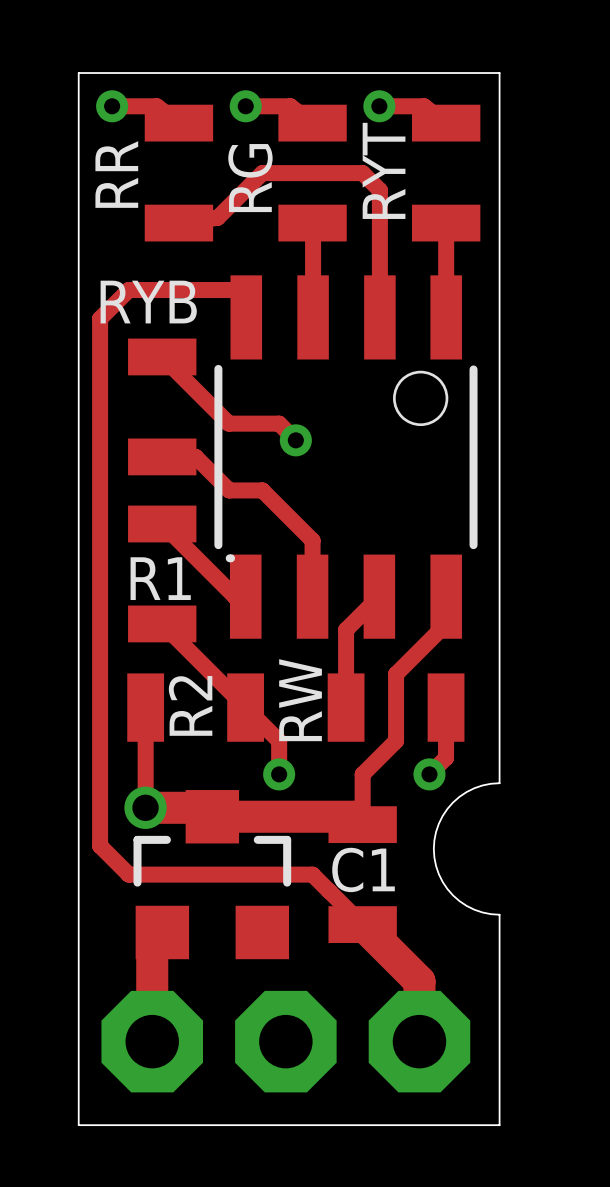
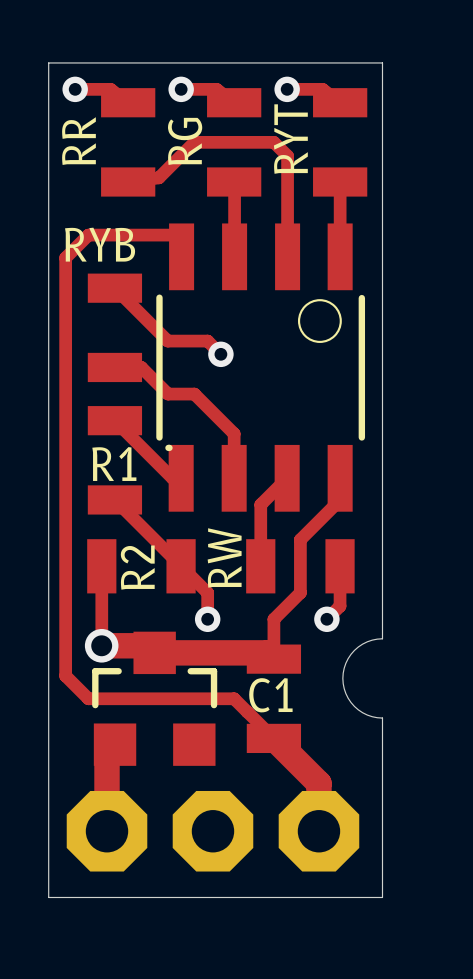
board edge: (499, 783) (474, 788) (453, 802) (438, 823) (433, 848) (438, 874) (453, 895) (474, 909) (499, 914) -> (382, 626) (382, 638) (367, 641) (351, 654) (345, 663) (342, 678) (345, 693) (351, 702) (367, 715) (382, 718) (382, 730)

